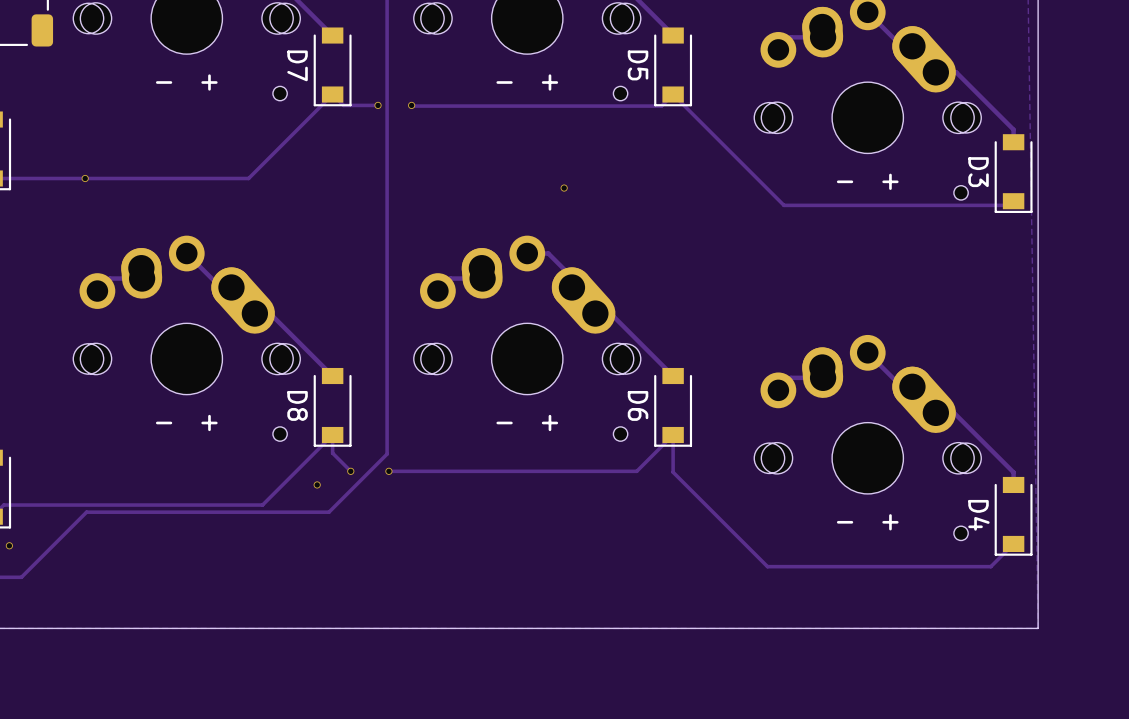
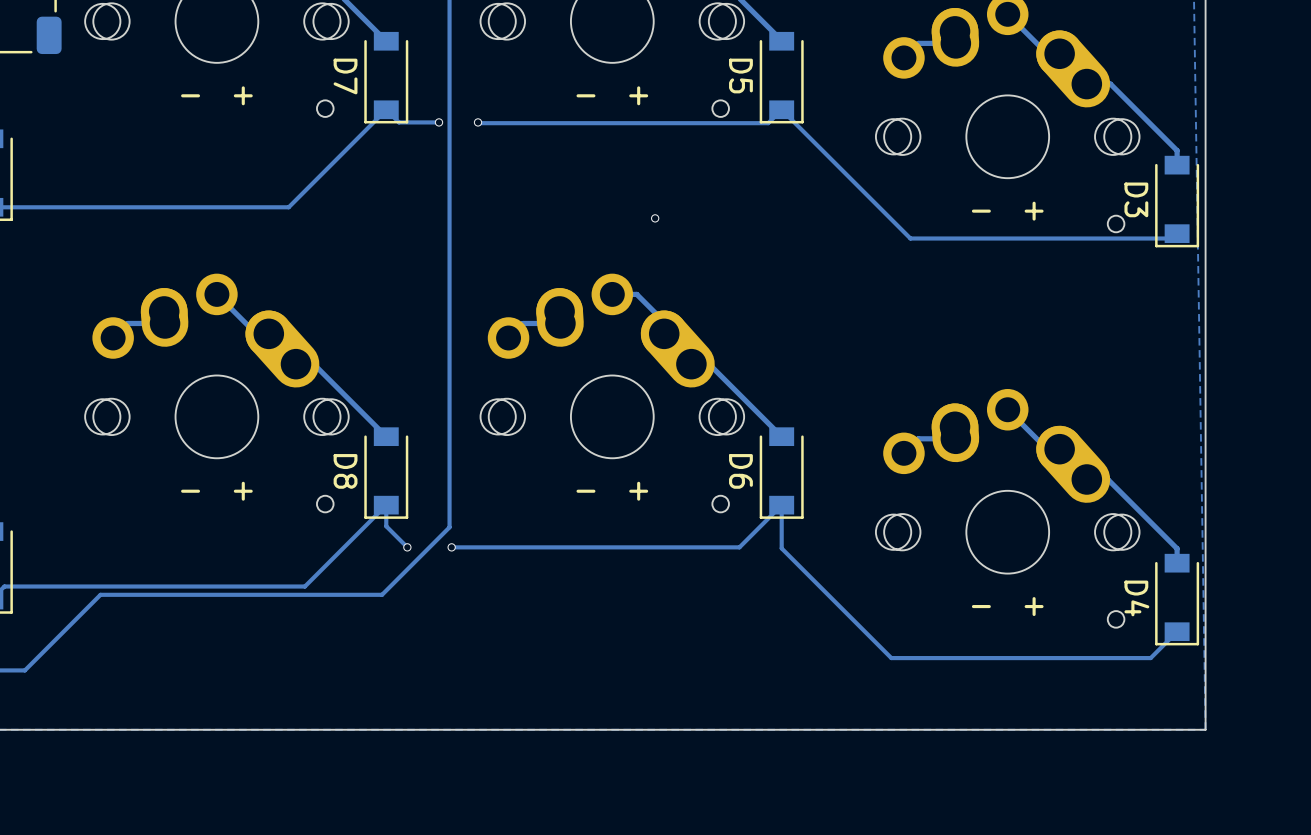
via: (85, 178) -> none
via: (317, 484) -> none
via: (9, 545) -> none

